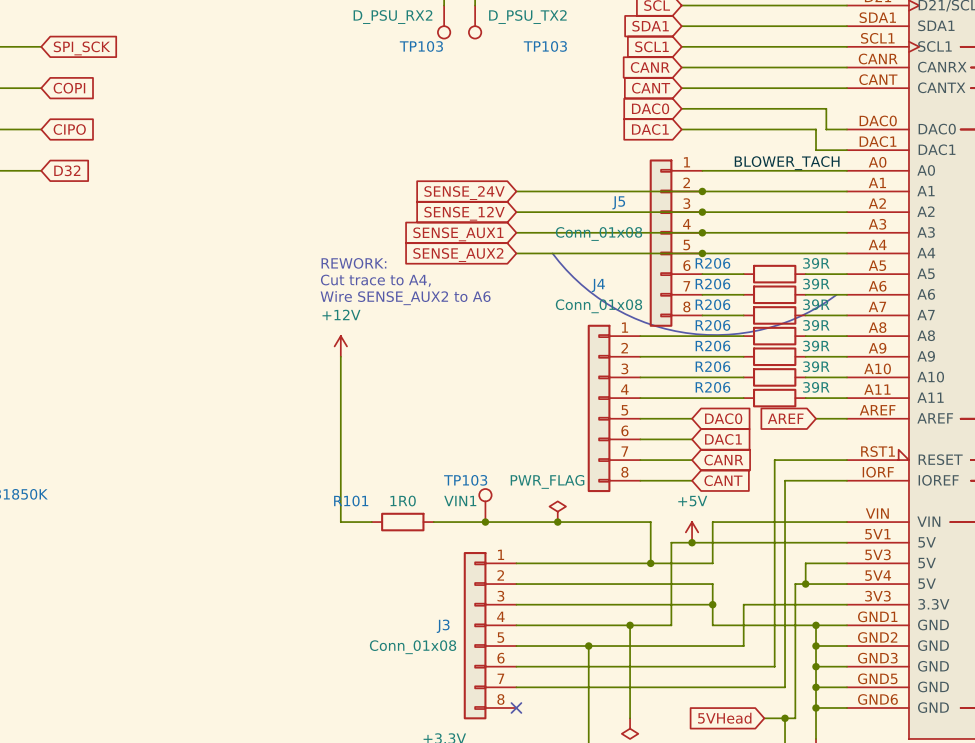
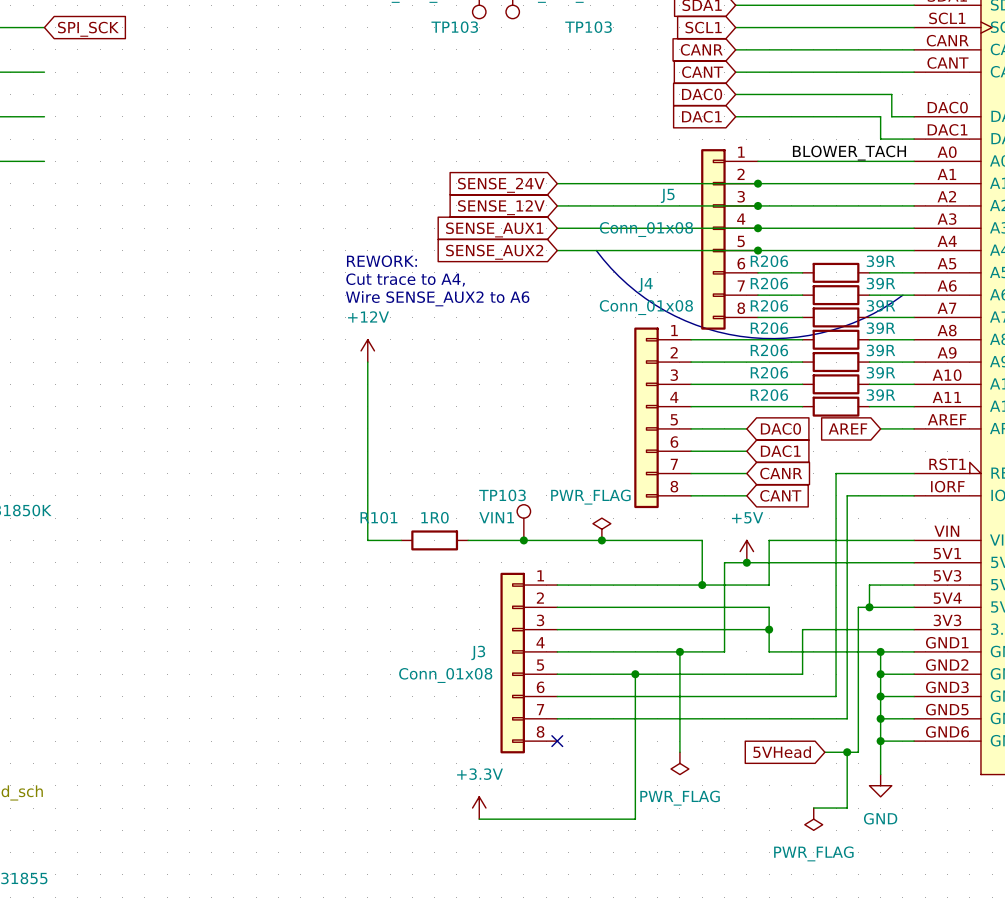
global label: COPI (69, 88) -> none
global label: CIPO (69, 129) -> none
global label: D32 (67, 170) -> none

